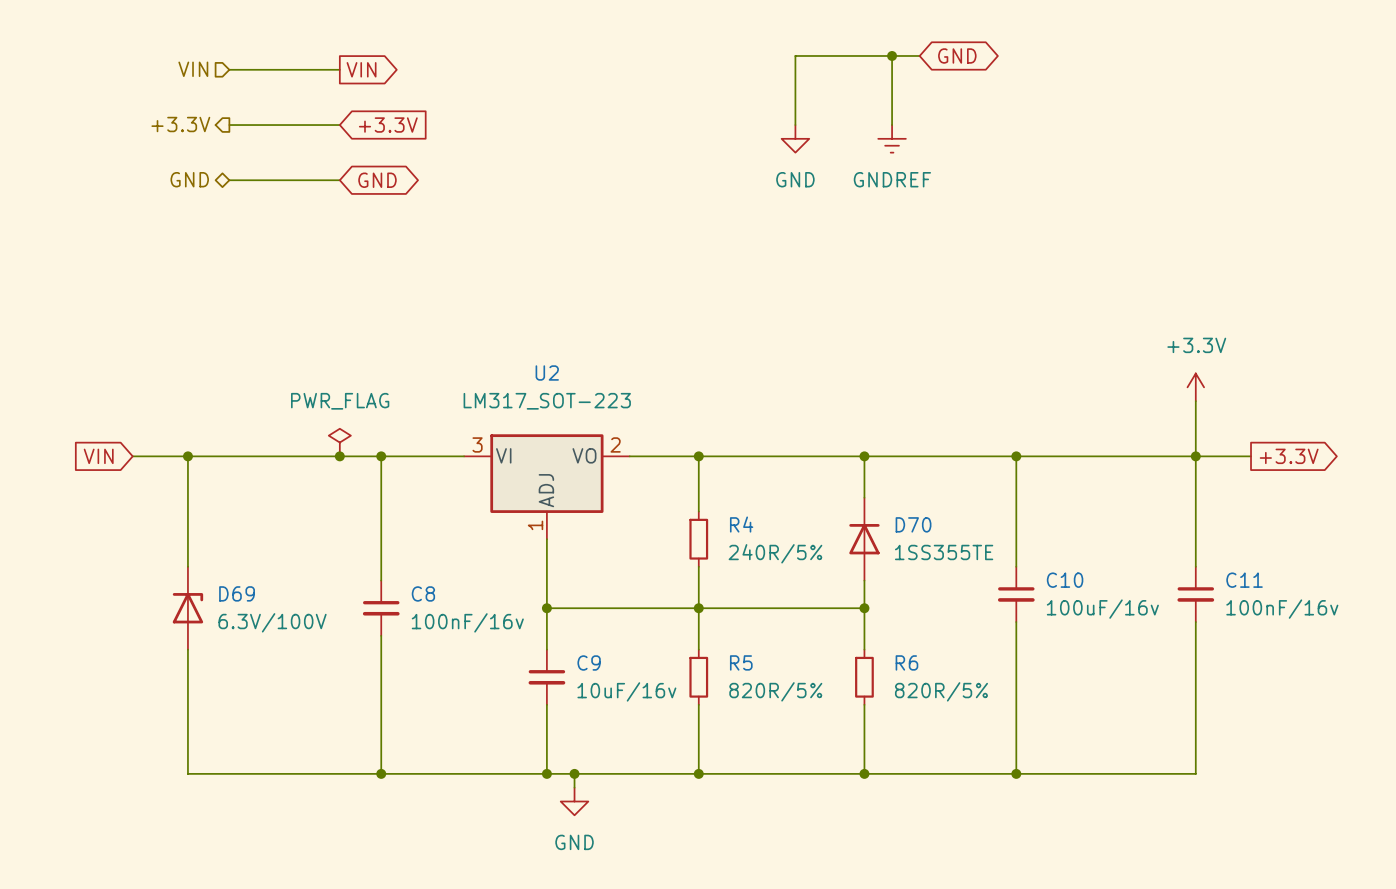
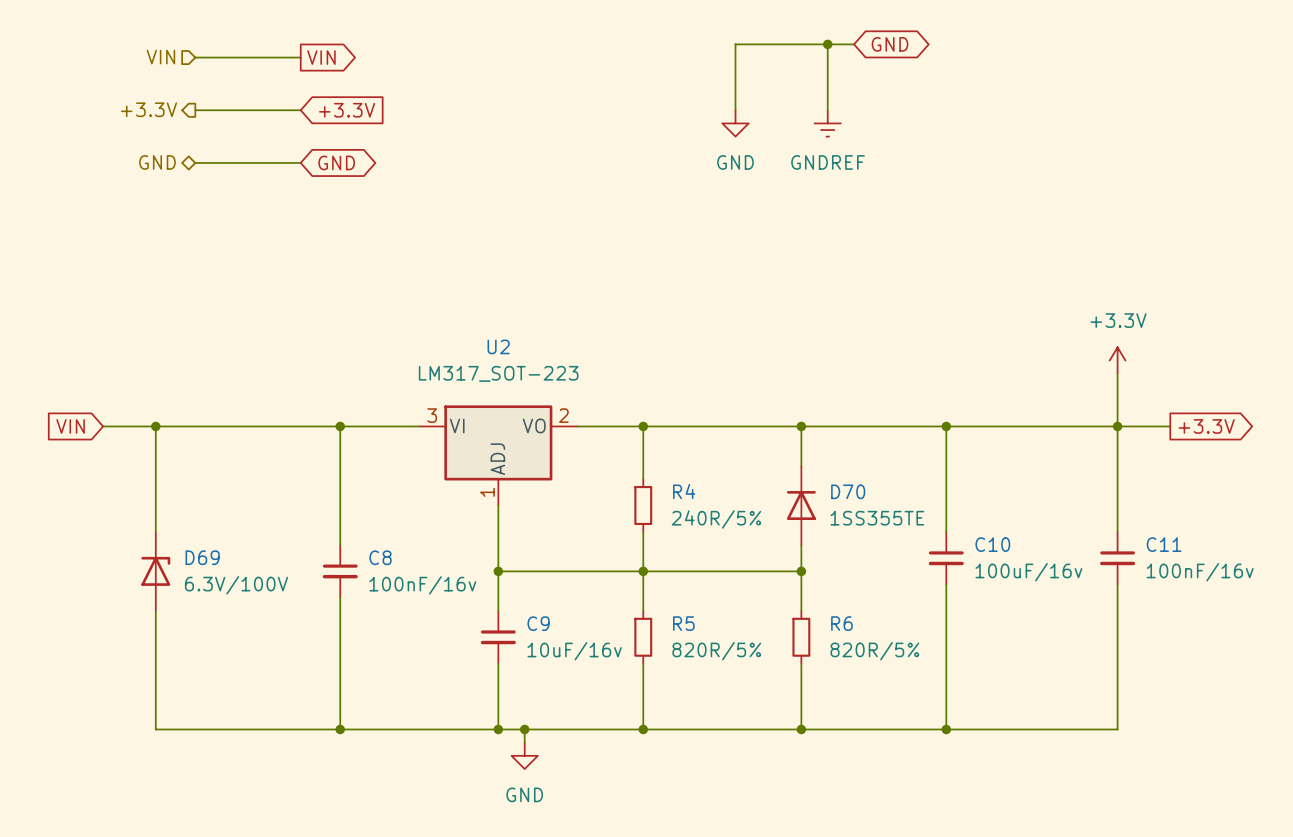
power symbol: PWR_FLAG (339, 442) -> none
junction: (339, 456) -> none

